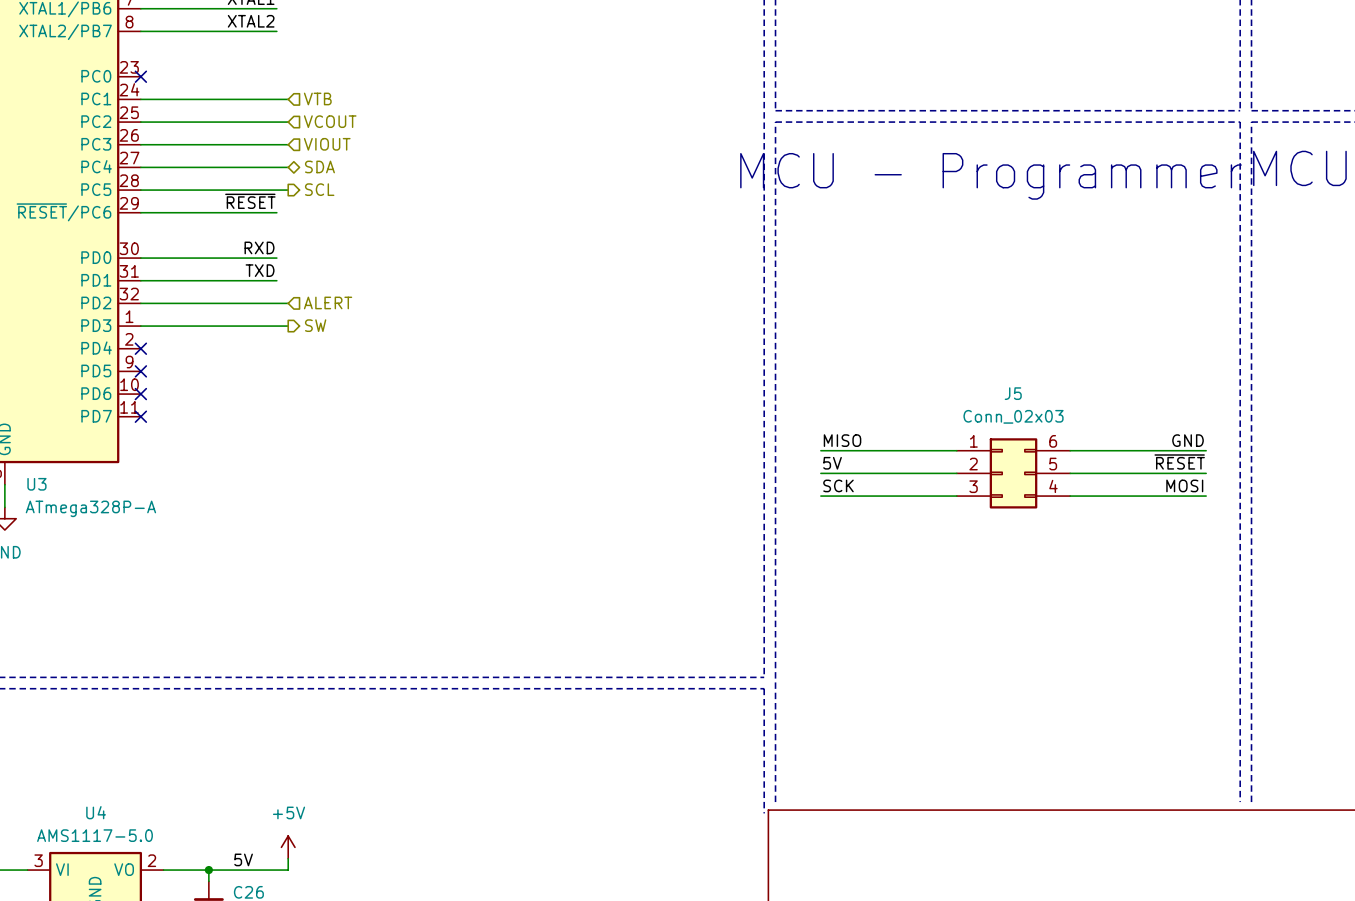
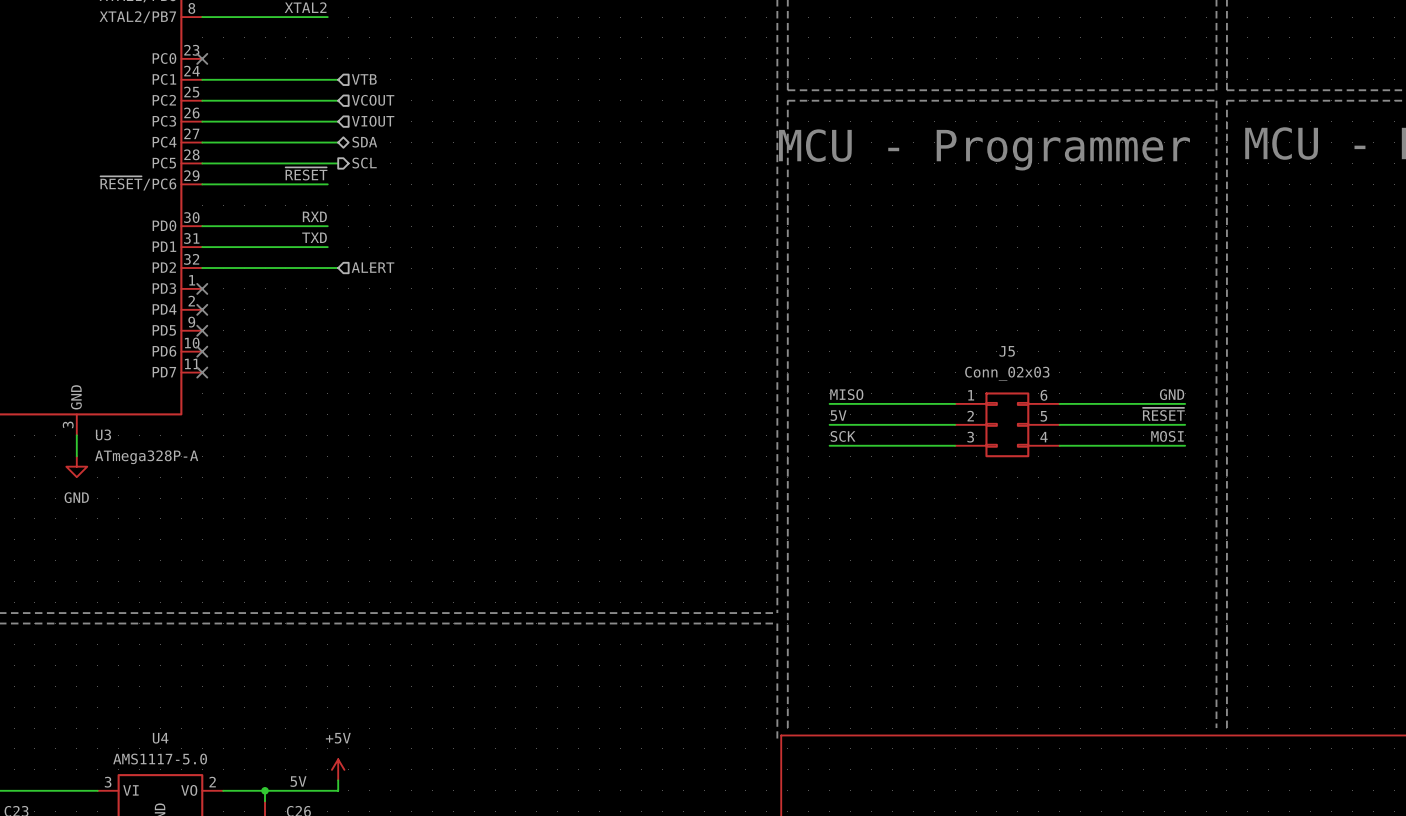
hierarchical label: SW (315, 325) -> none
wire: (140, 326) (288, 326) -> none
no-connect mark: none -> (202, 288)

